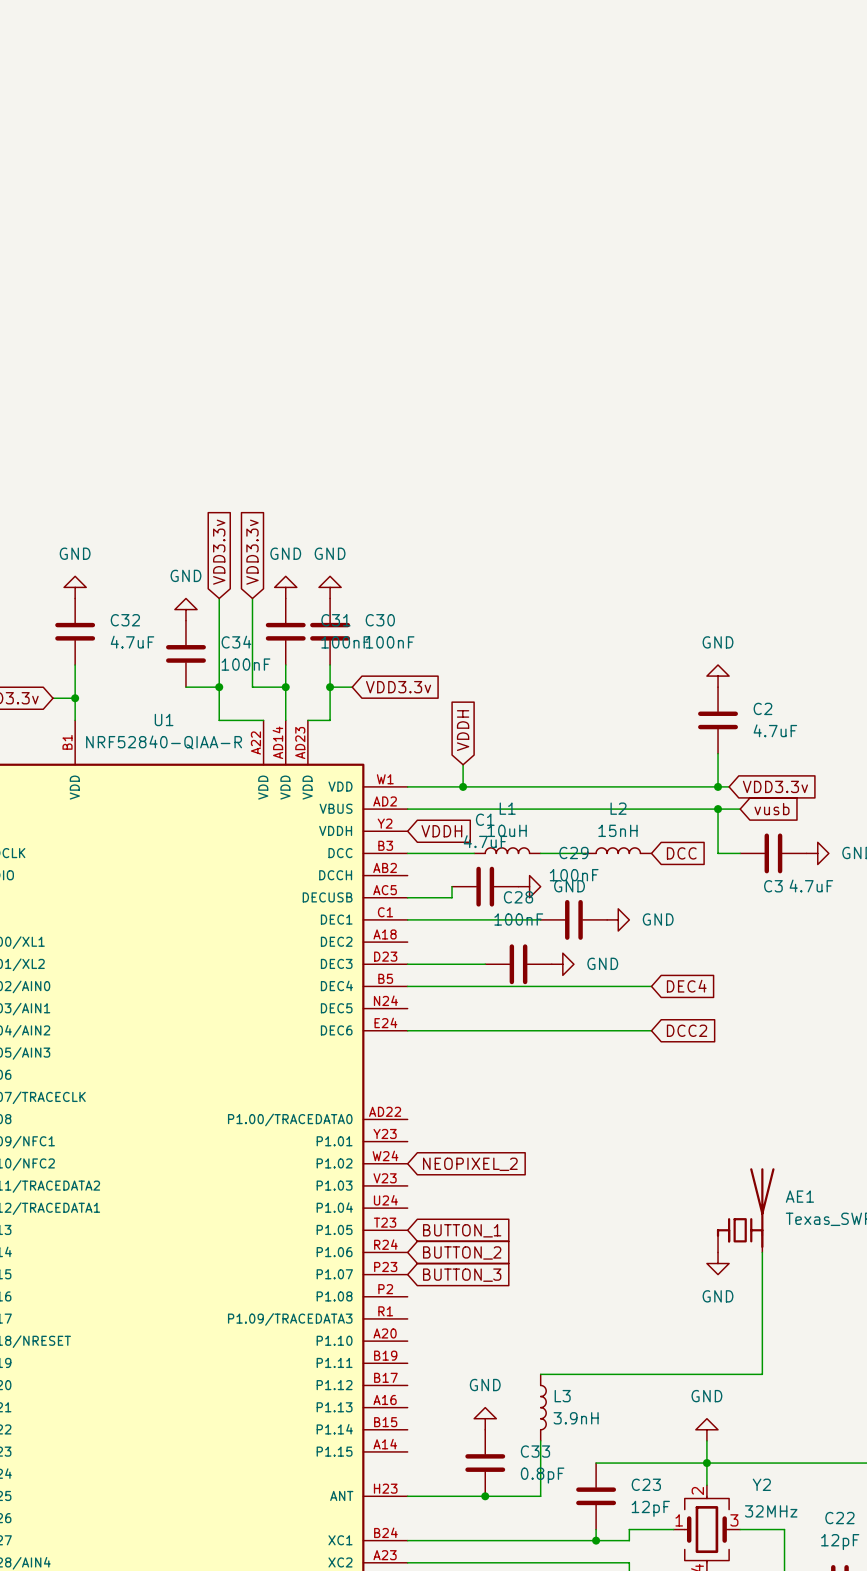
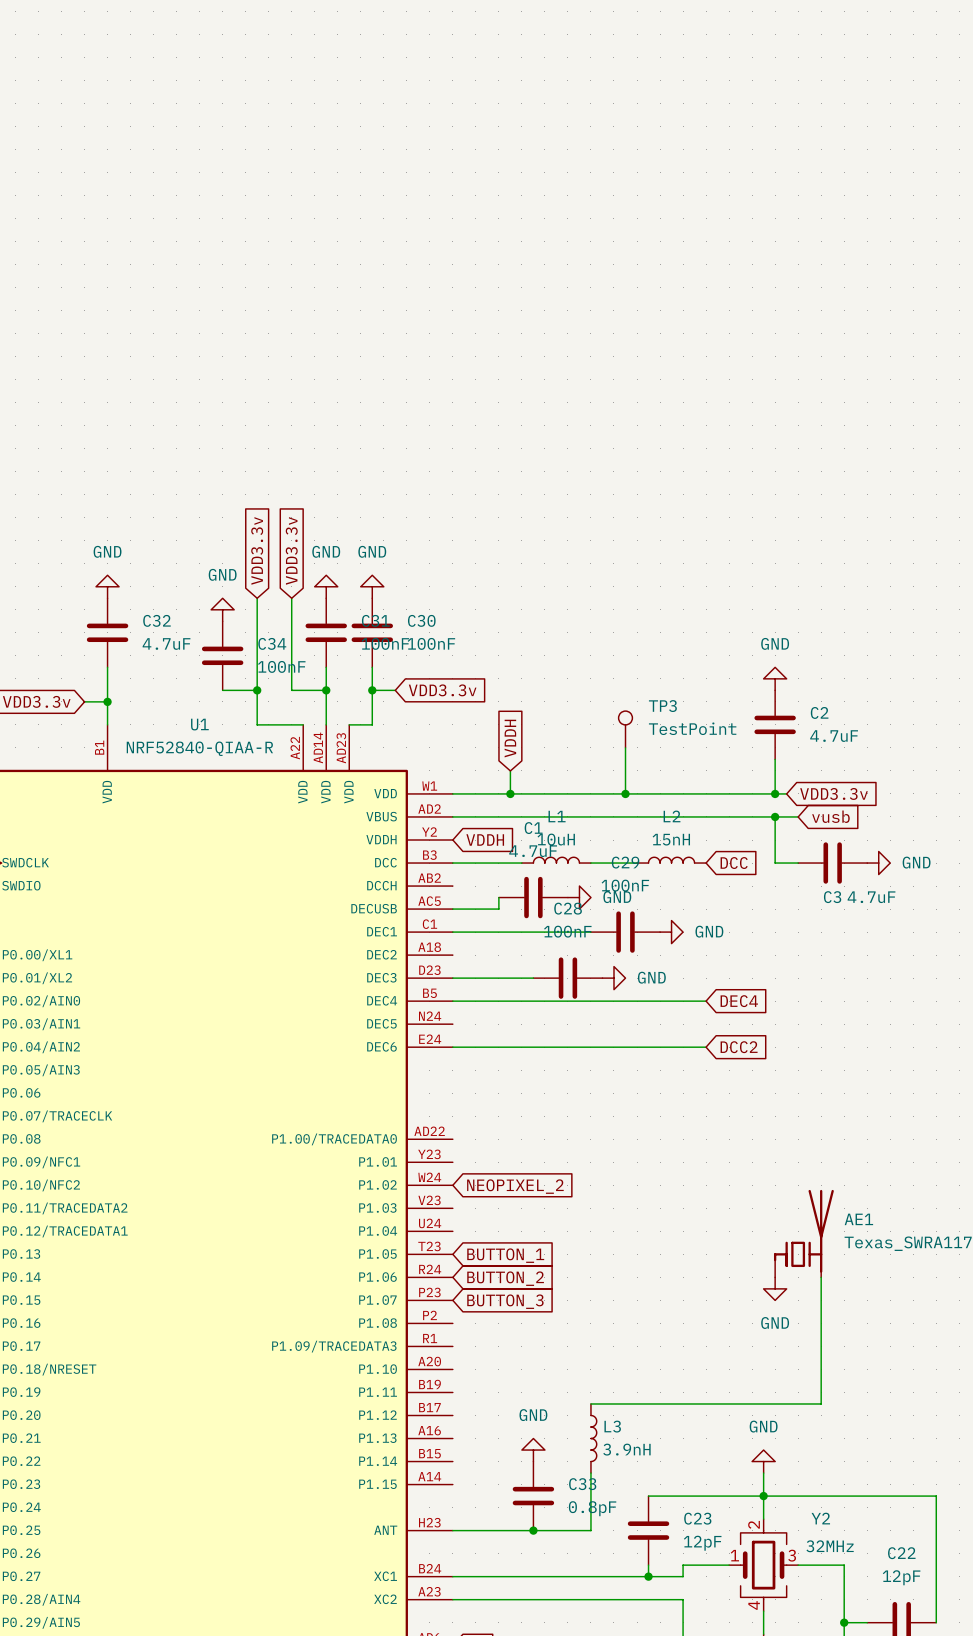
TP3: none -> TestPoint (625, 729)
wire: none -> (625, 747) (625, 793)
junction: none -> (625, 793)

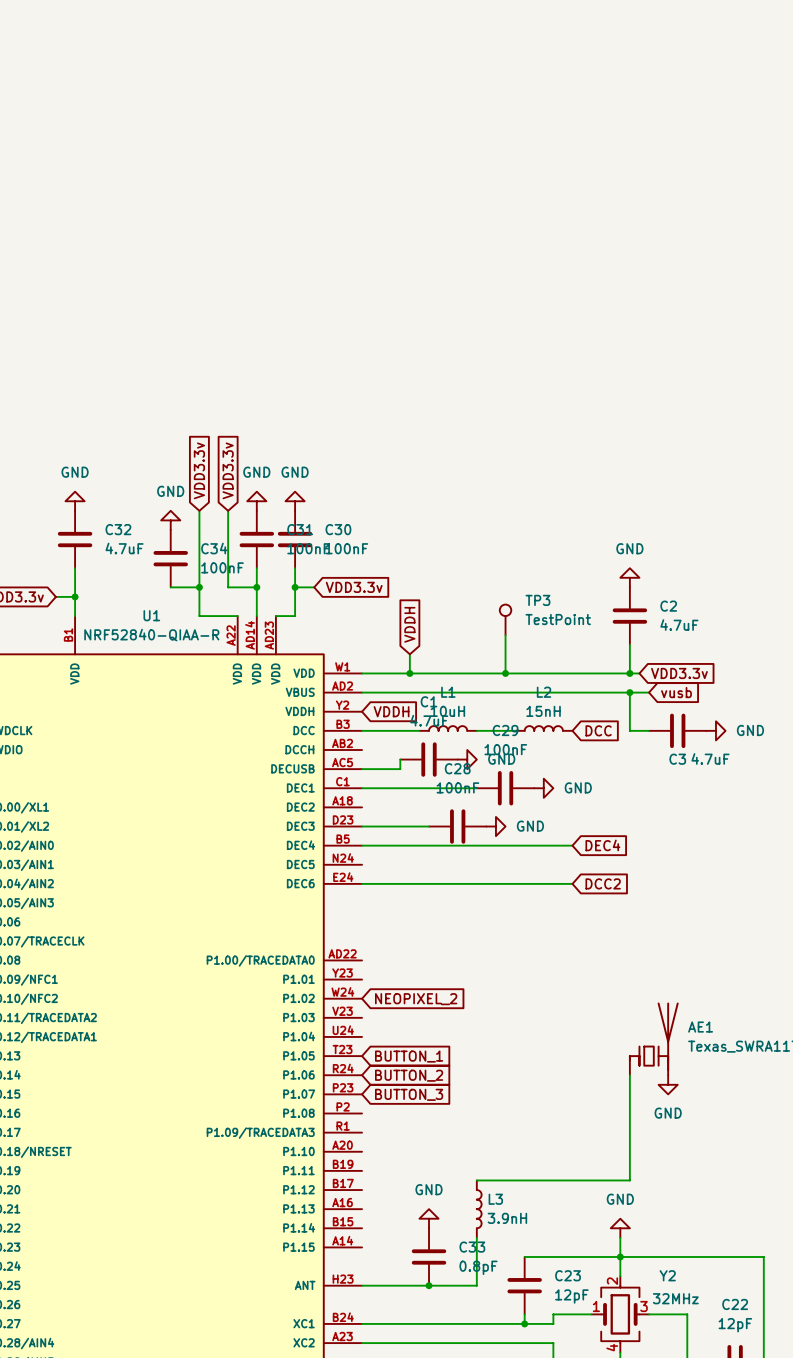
wire: (821, 1277) (821, 1403) (775, 1403) -> (629, 1075) (629, 1180)
power symbol position: GND (775, 1288) -> GND (668, 1084)

